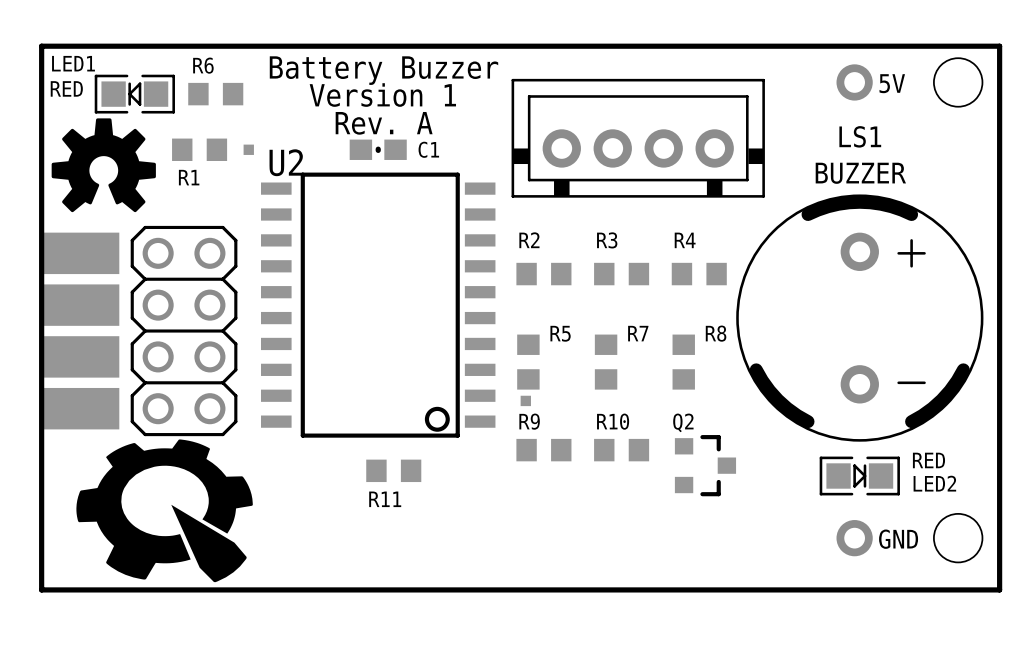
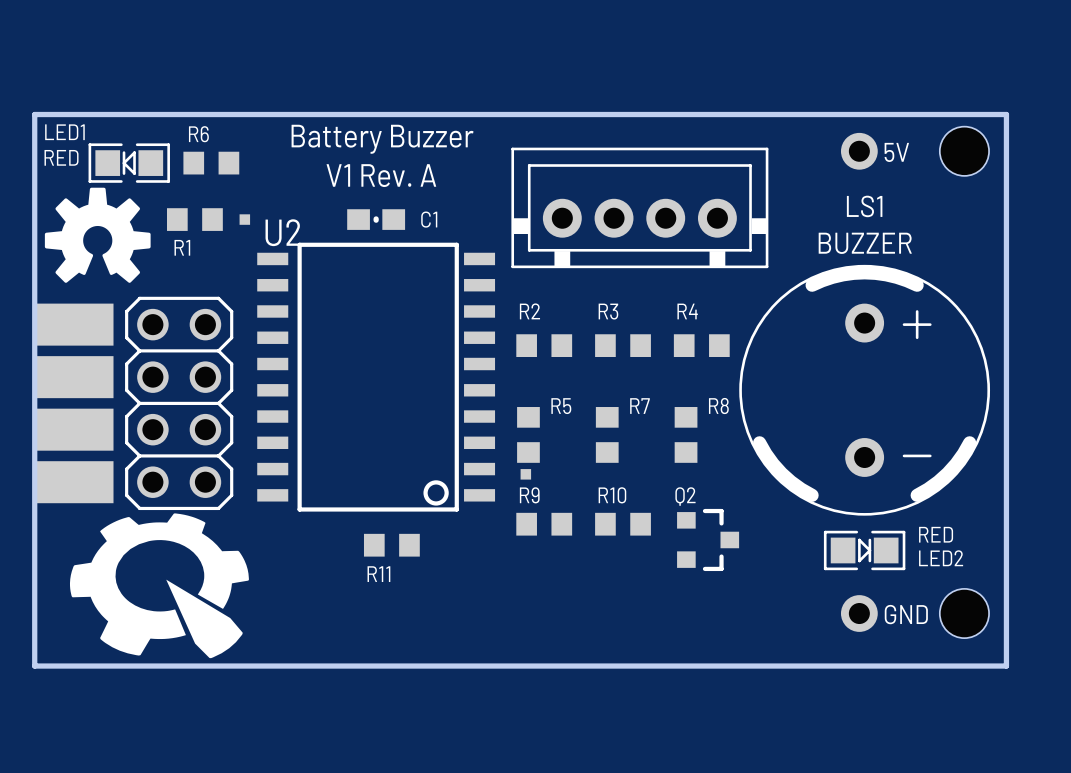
text: Version 1 (382, 95) -> V1 Rev. A (381, 175)
text: Rev. A (384, 123) -> none

